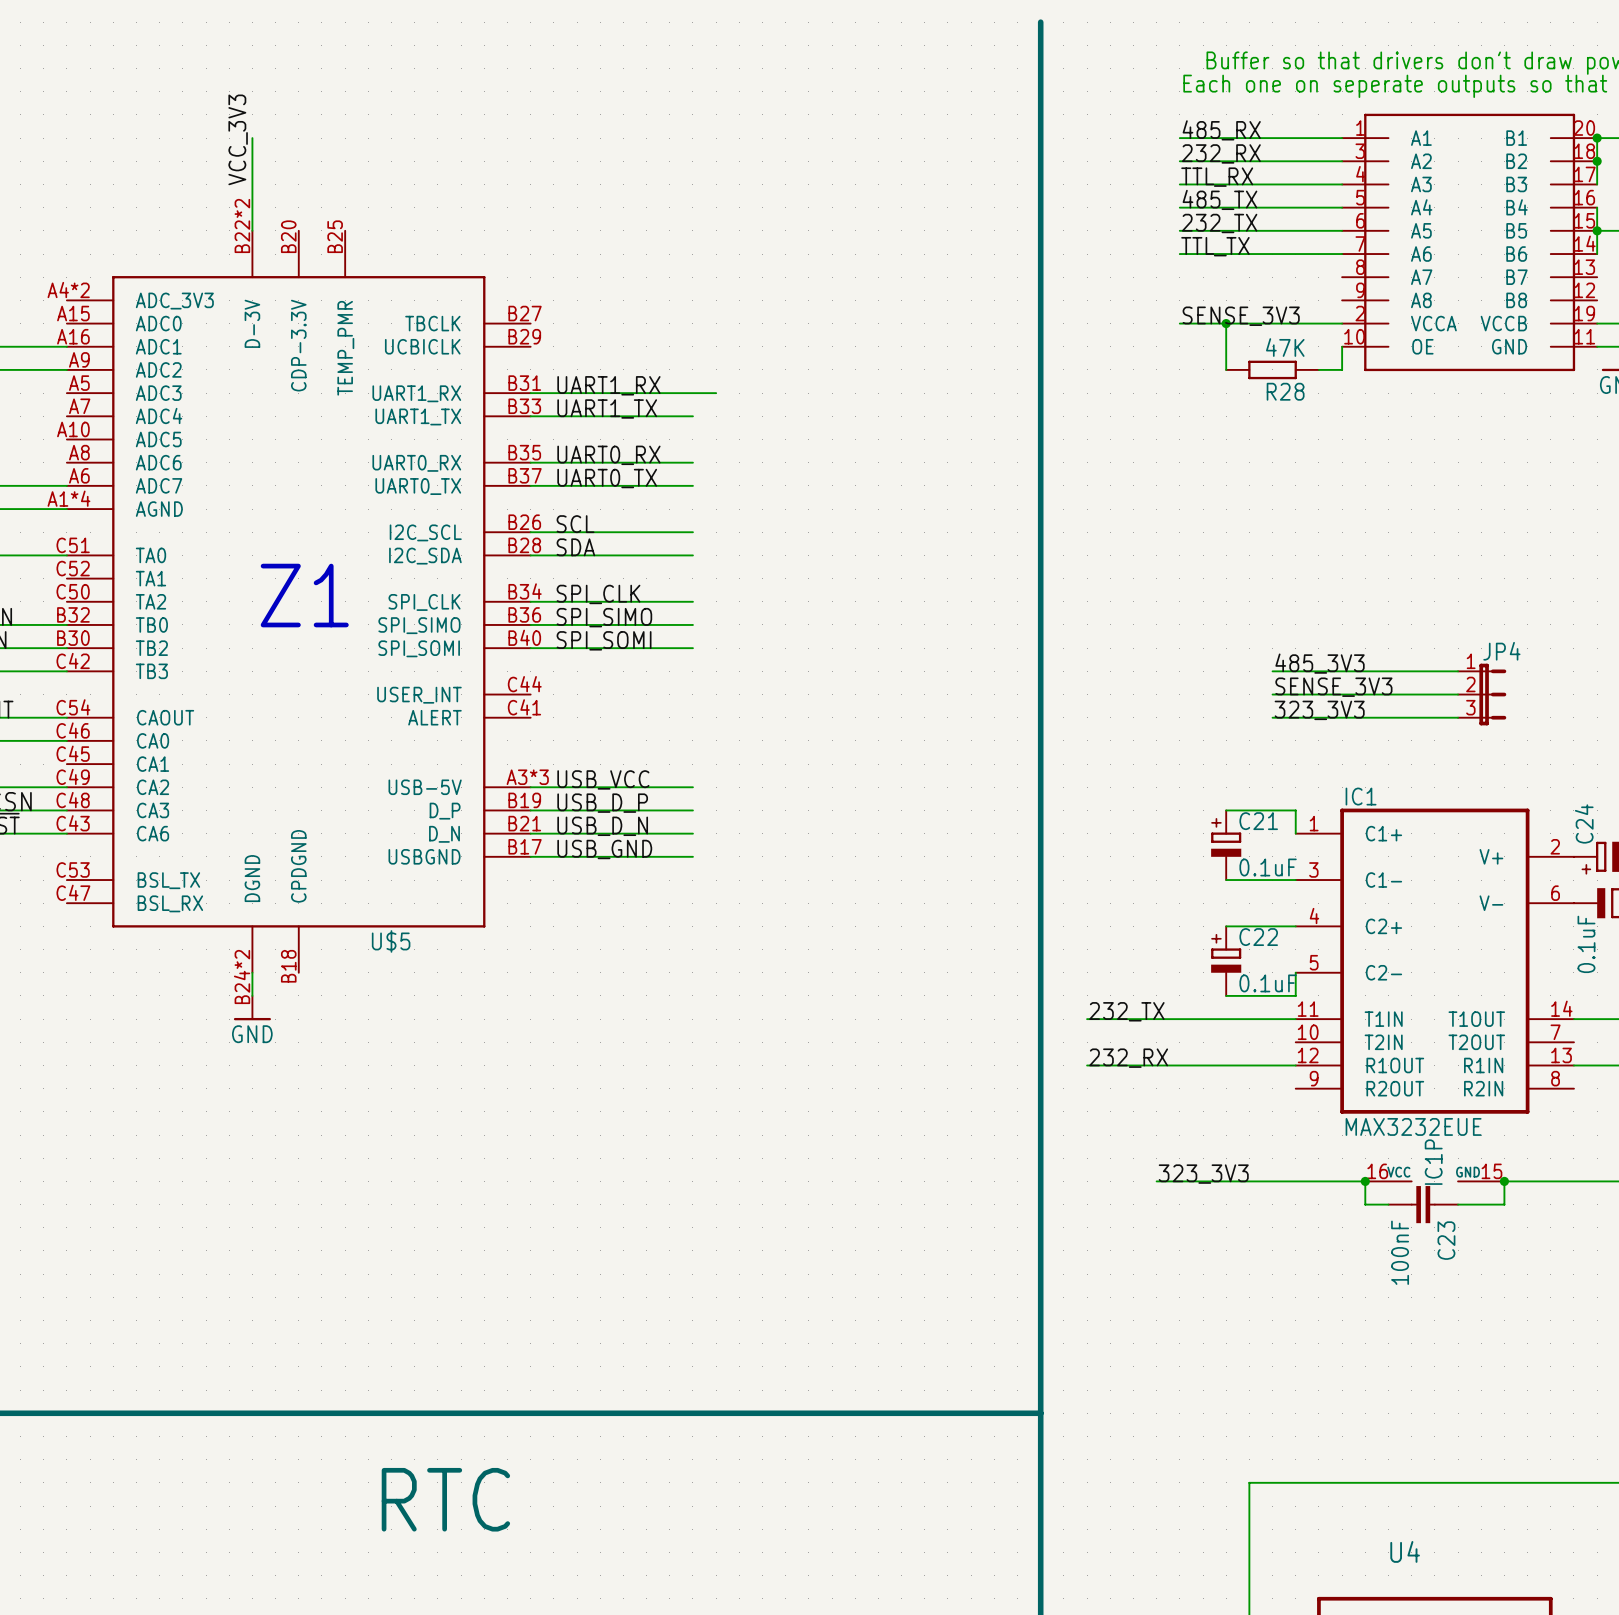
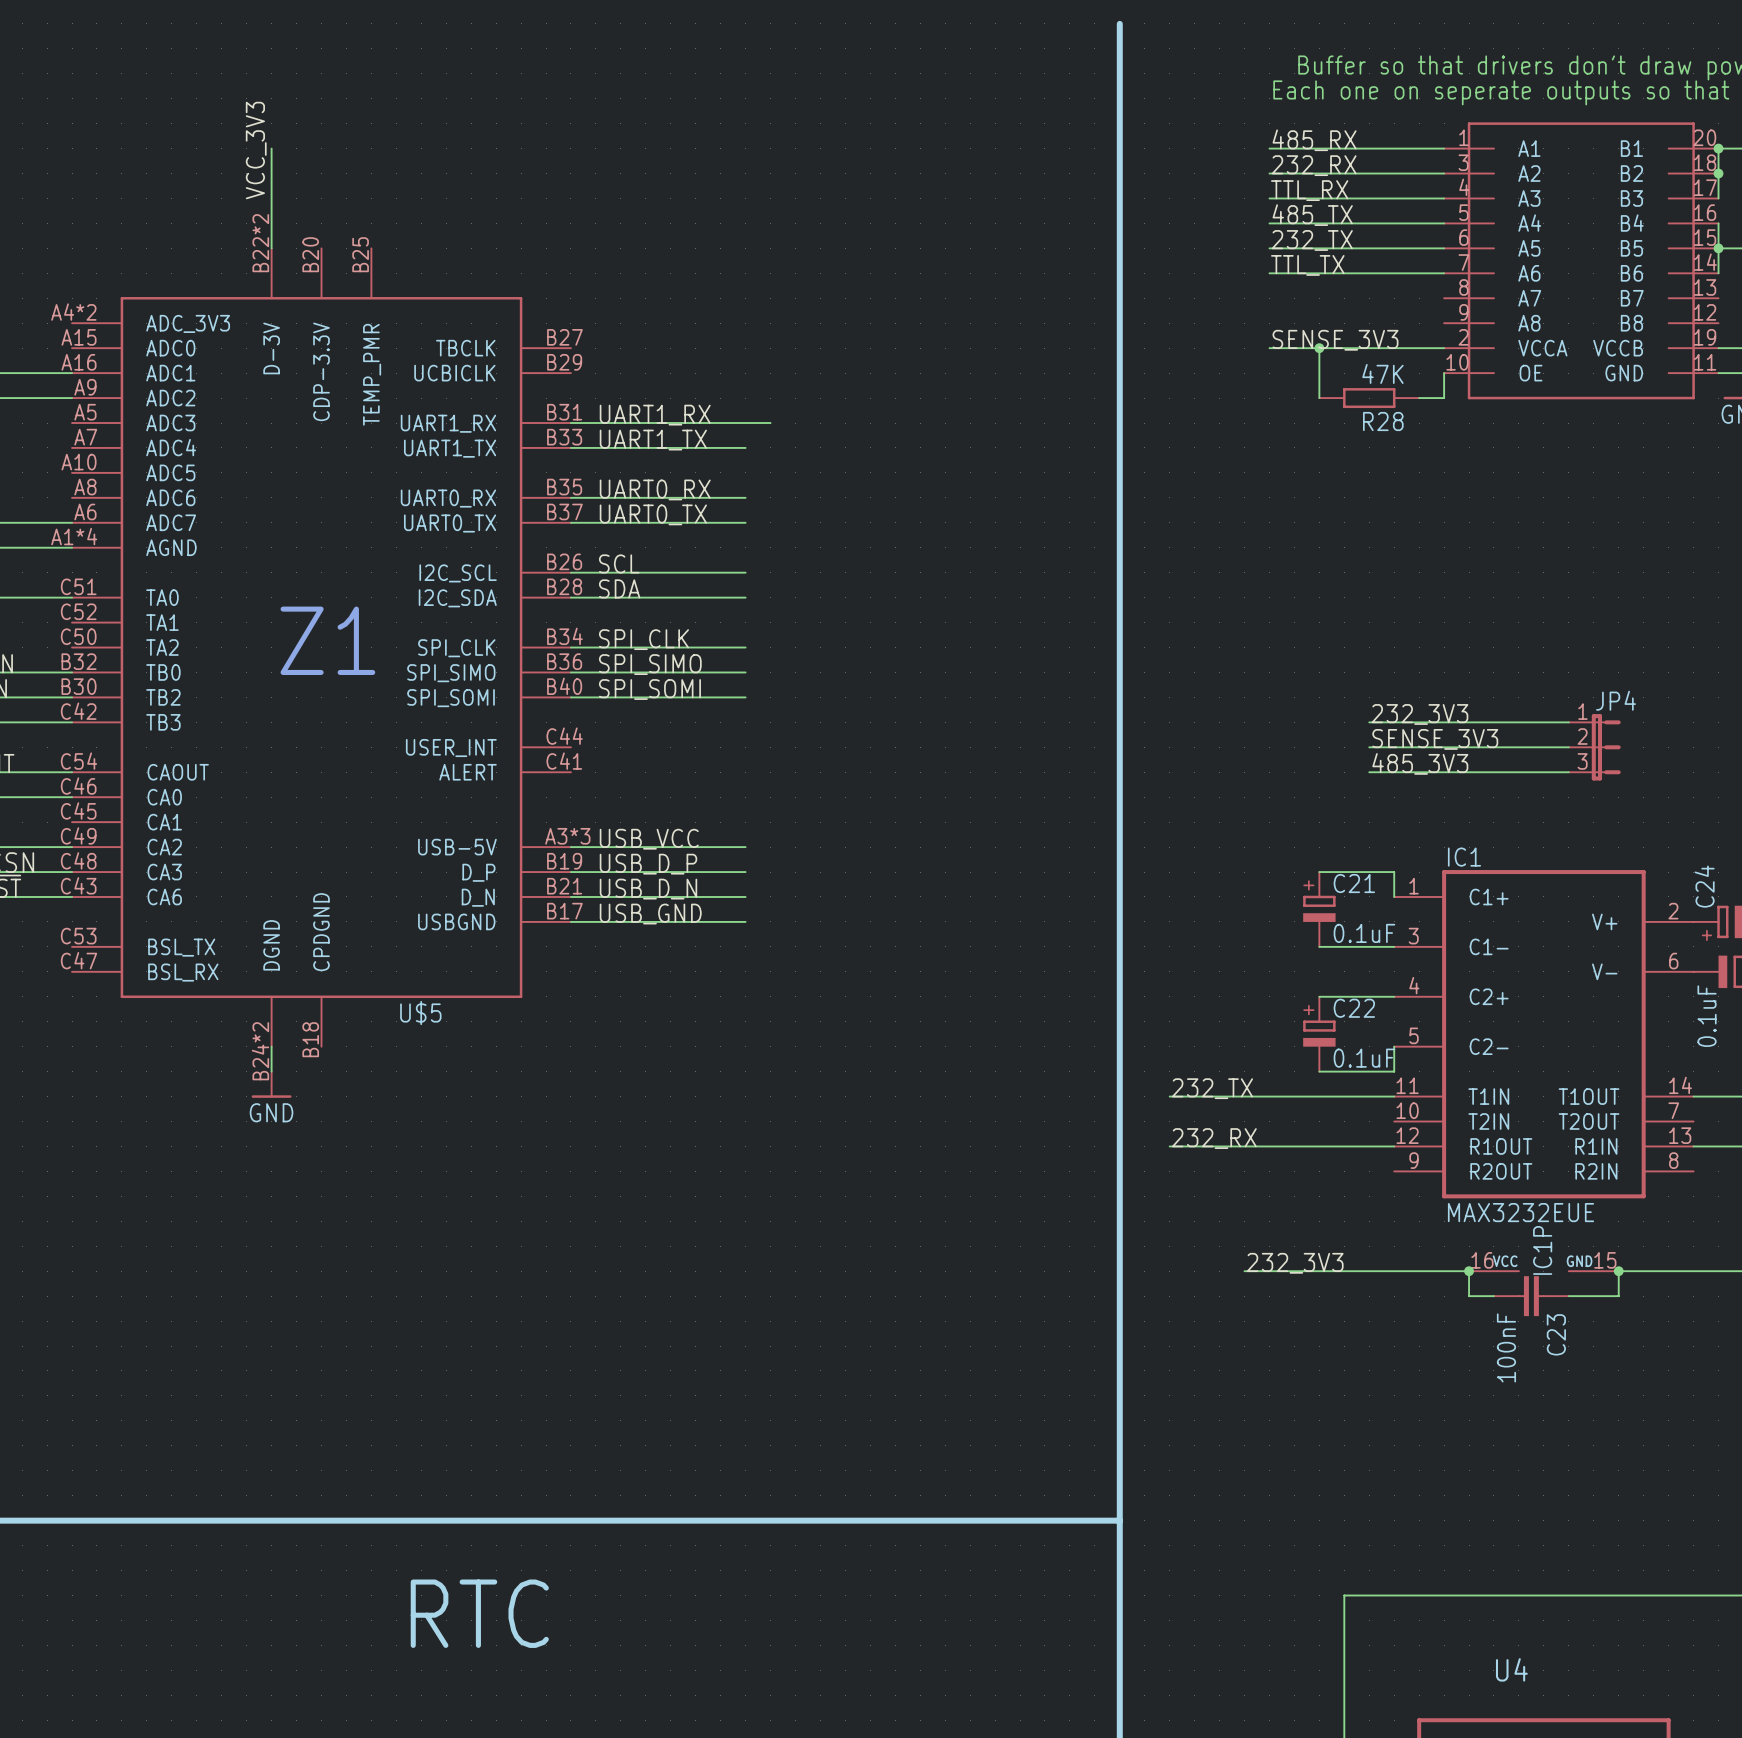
label: 485_3V3 (1320, 663) -> 232_3V3 (1419, 714)
label: 323_3V3 (1319, 710) -> 485_3V3 (1420, 763)
label: 323_3V3 (1203, 1174) -> 232_3V3 (1295, 1263)

